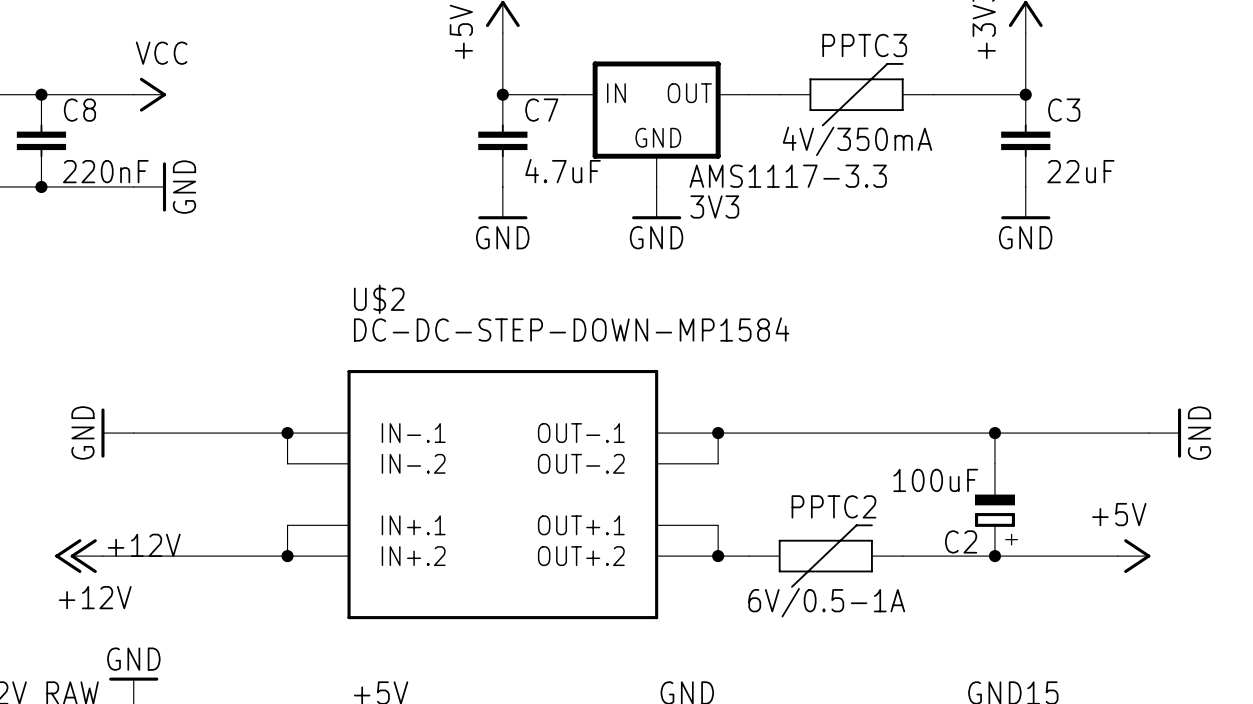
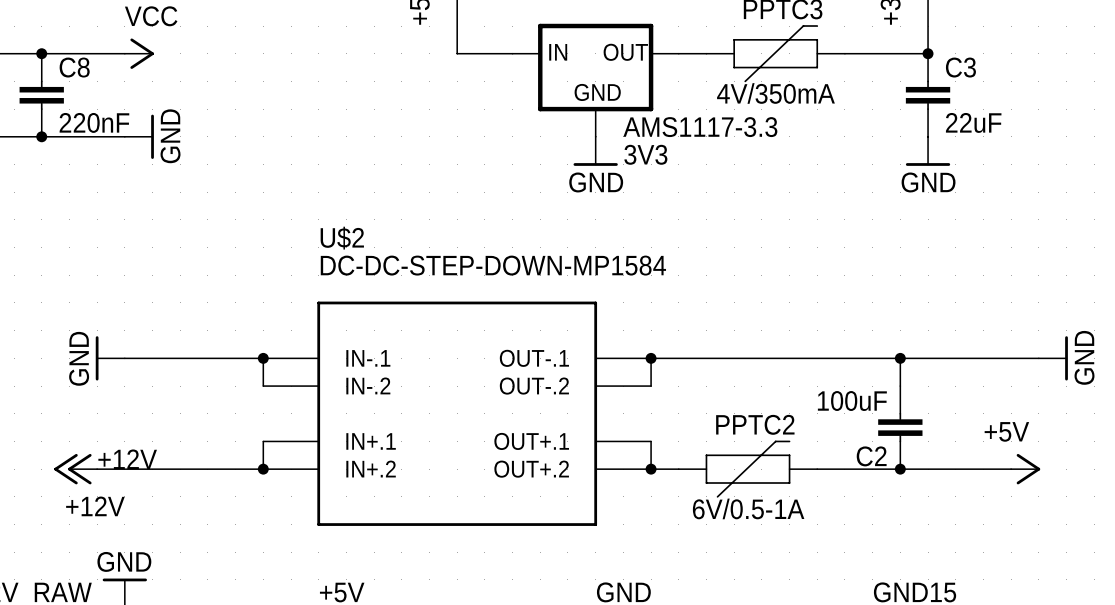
junction: (502, 94) -> none
C7: 4.7uF (502, 140) -> none
power symbol: GND (502, 203) -> none
C2 symbol: [974, 463, 1015, 557] -> [878, 386, 923, 470]

